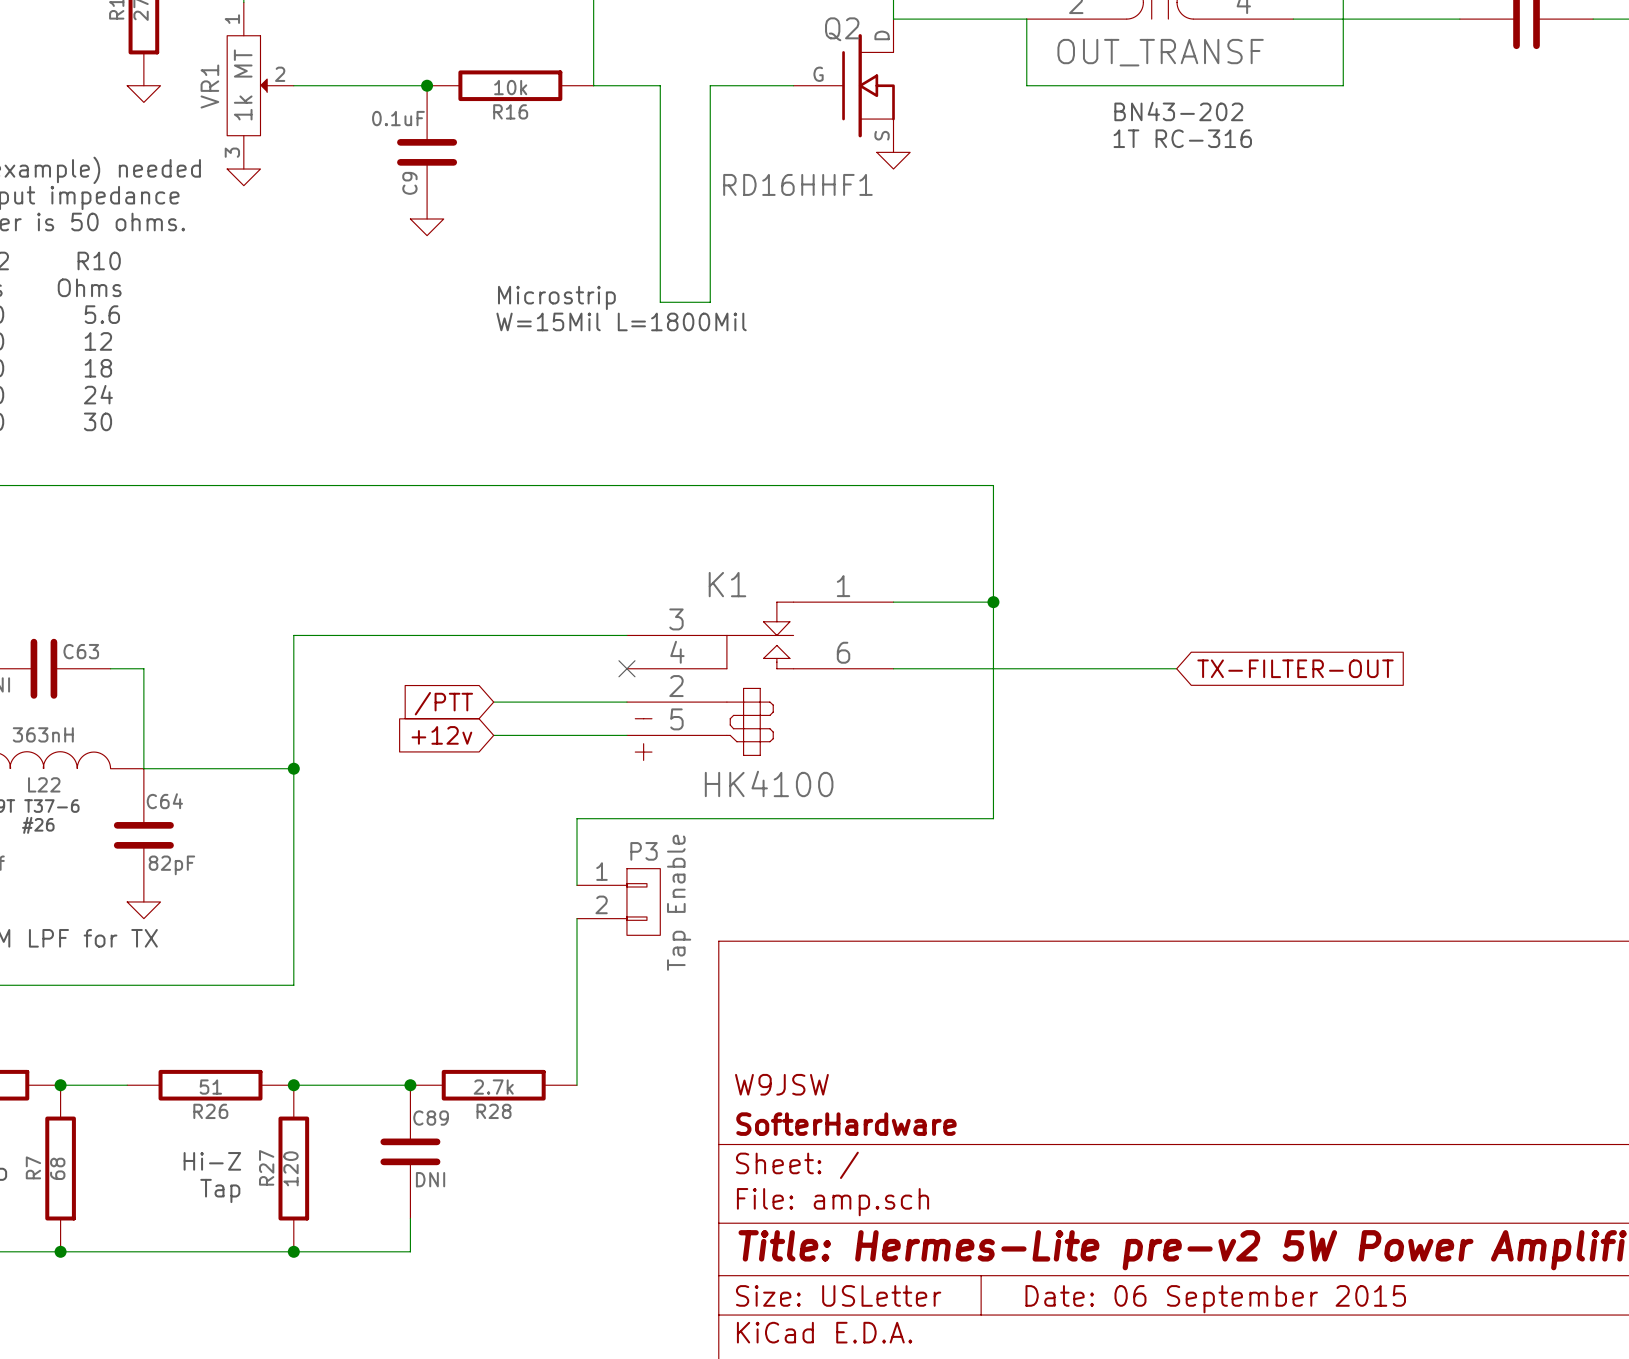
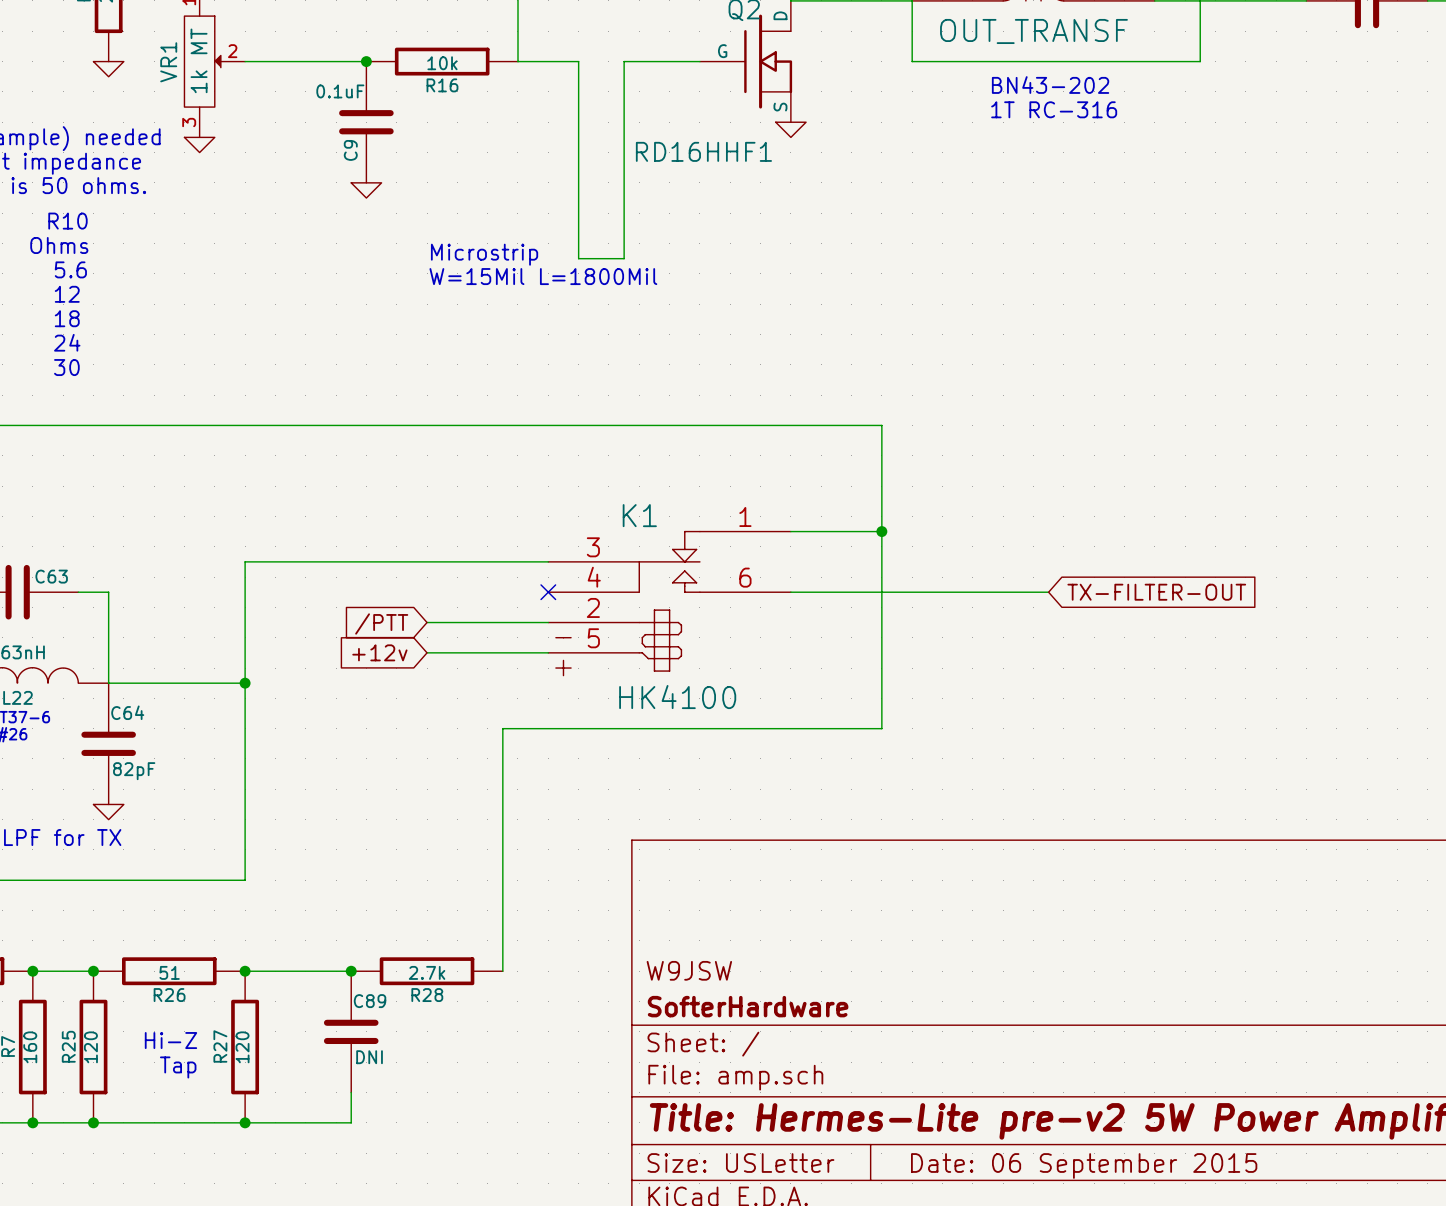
wire: none -> (502, 789) (502, 819)
P3: Tap Enable (618, 901) -> none
junction: none -> (93, 971)
R7 value: 68 (57, 1168) -> 160 (30, 1047)
R25: none -> 120 (93, 1047)
junction: none -> (93, 1122)

